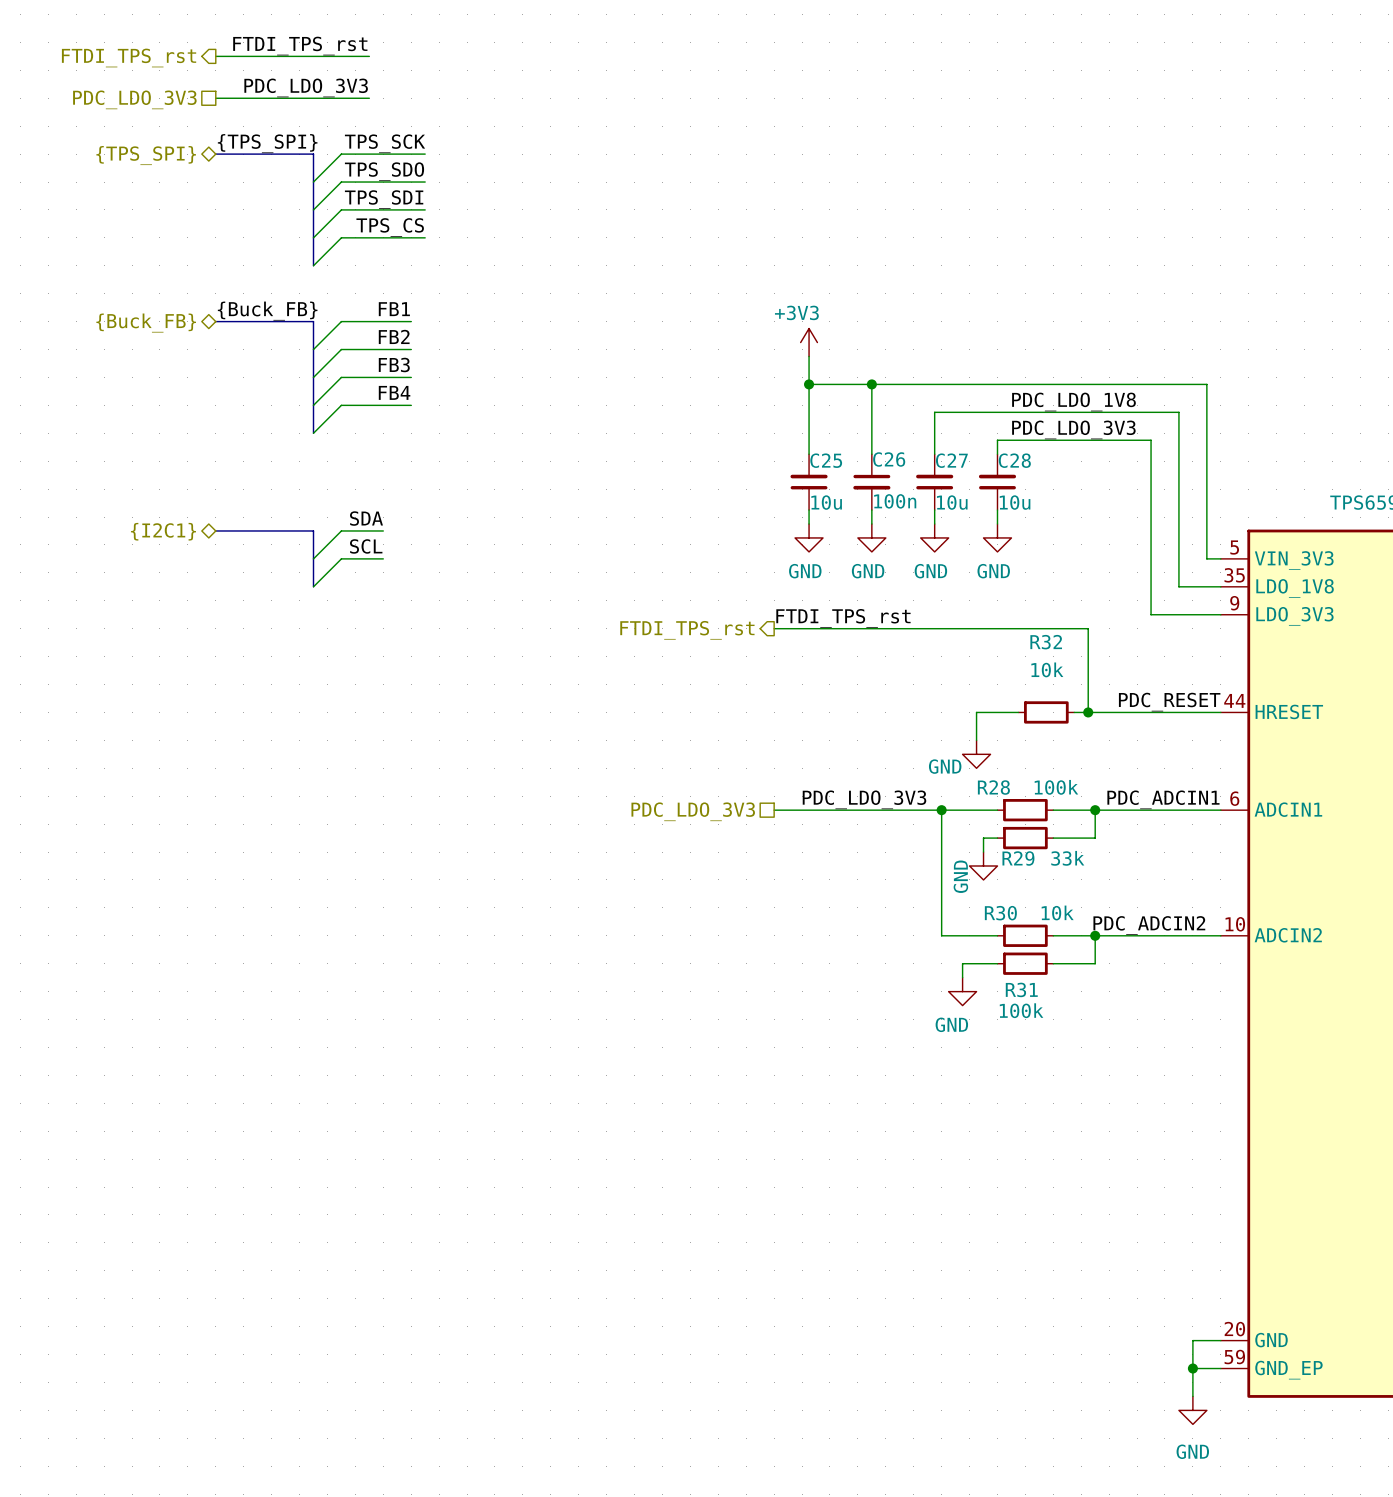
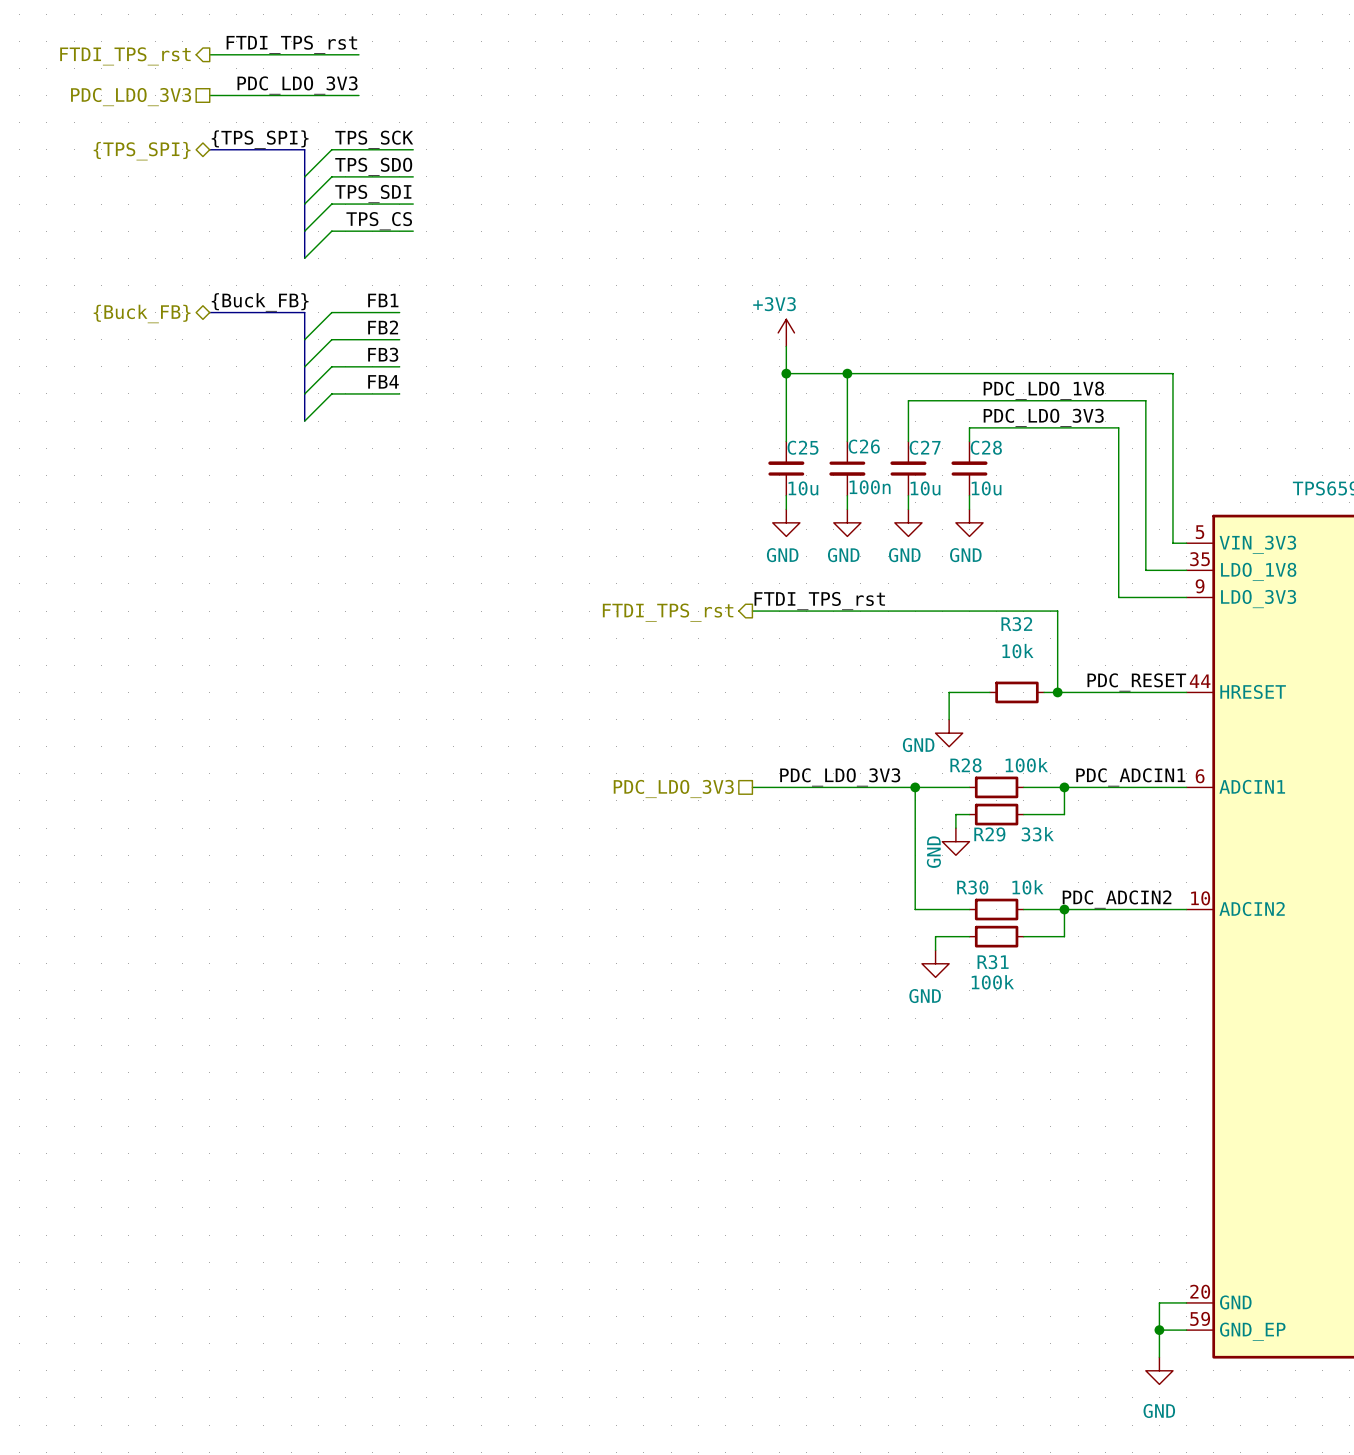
label: SDA (366, 518) -> none
bus: (215, 530) (313, 530) (313, 586) -> none
wire: (383, 530) (341, 530) (313, 558) -> none
hierarchical label: {I2C1} (163, 531) -> none
label: SCL (366, 546) -> none
wire: (383, 558) (341, 558) (313, 586) -> none

